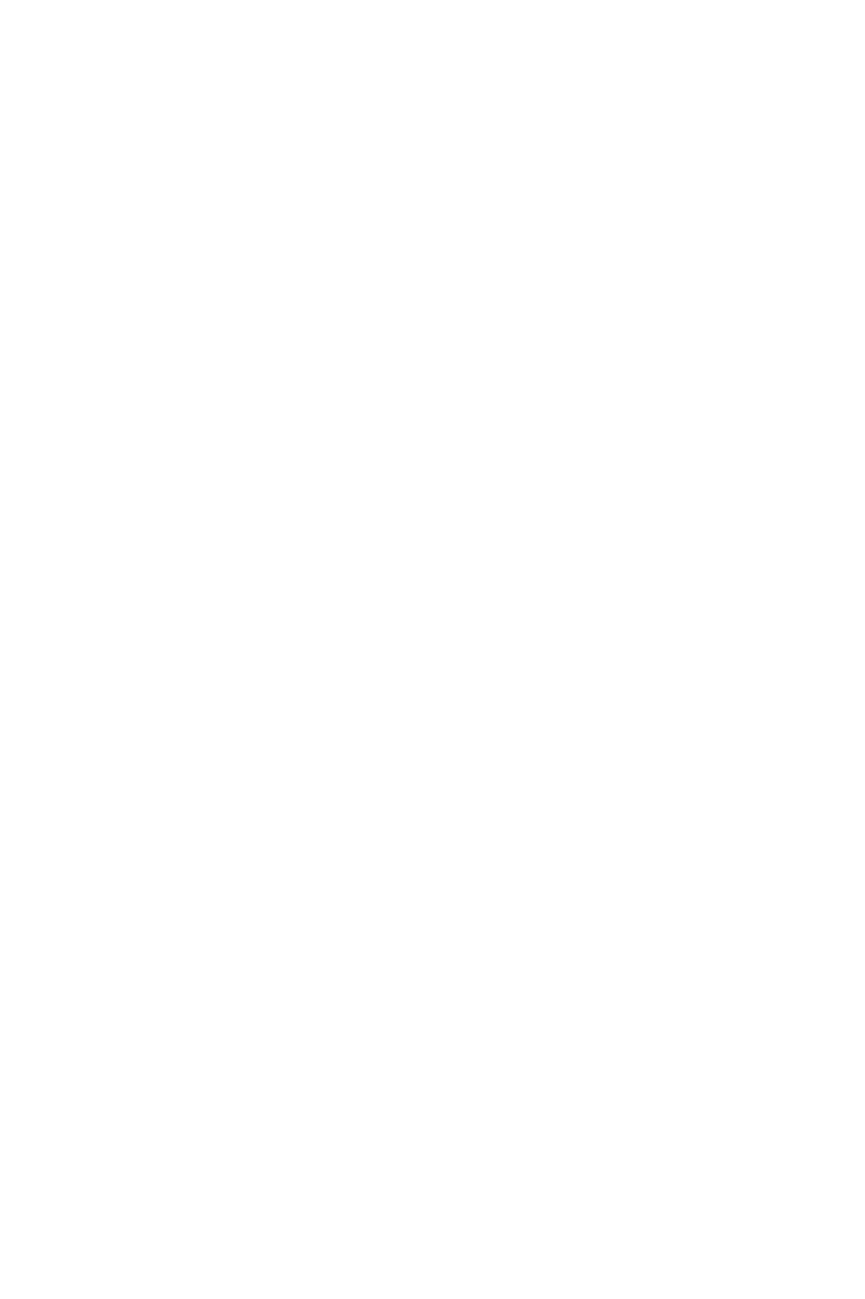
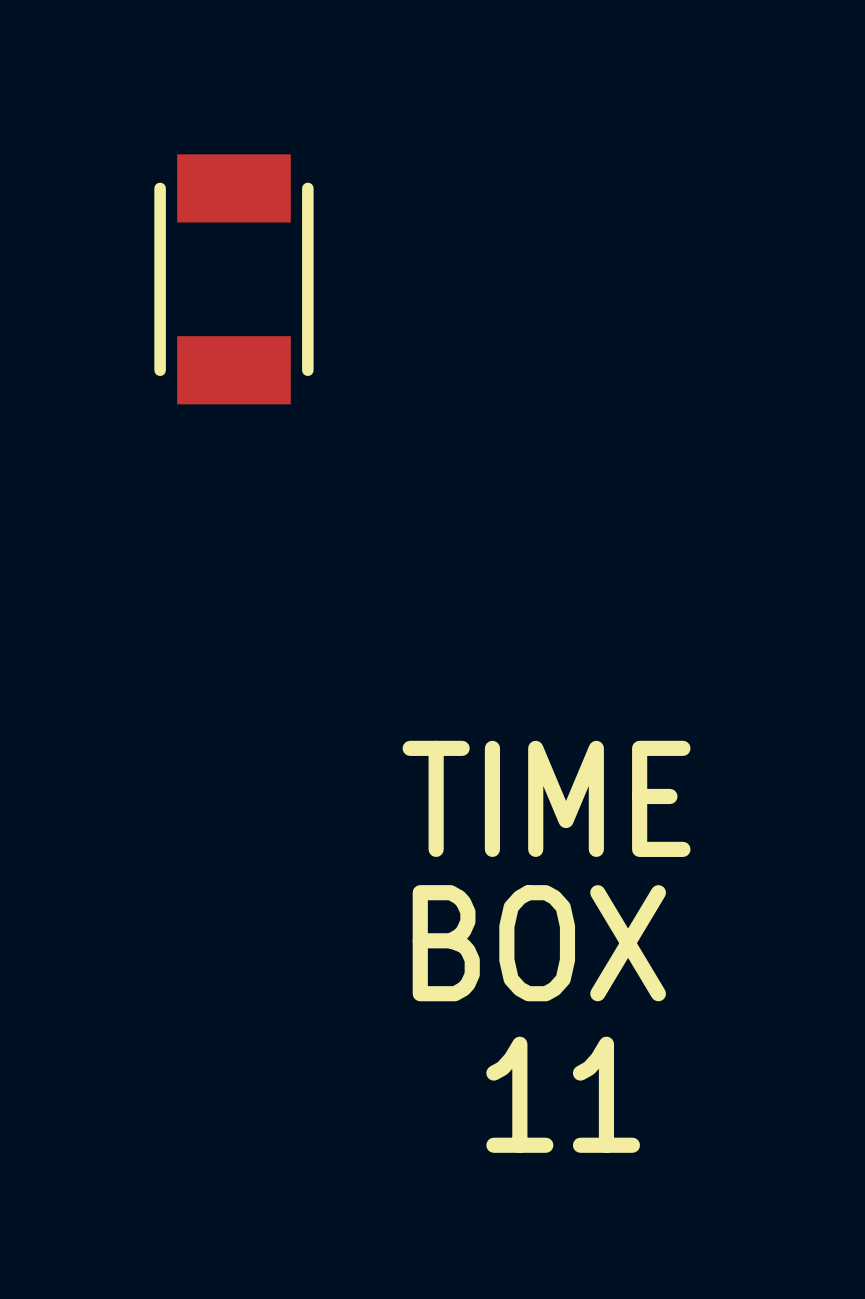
part: none -> (233, 279)
text: none -> TIME (546, 798)
text: none -> BOX (539, 943)
text: none -> 11 (563, 1094)

